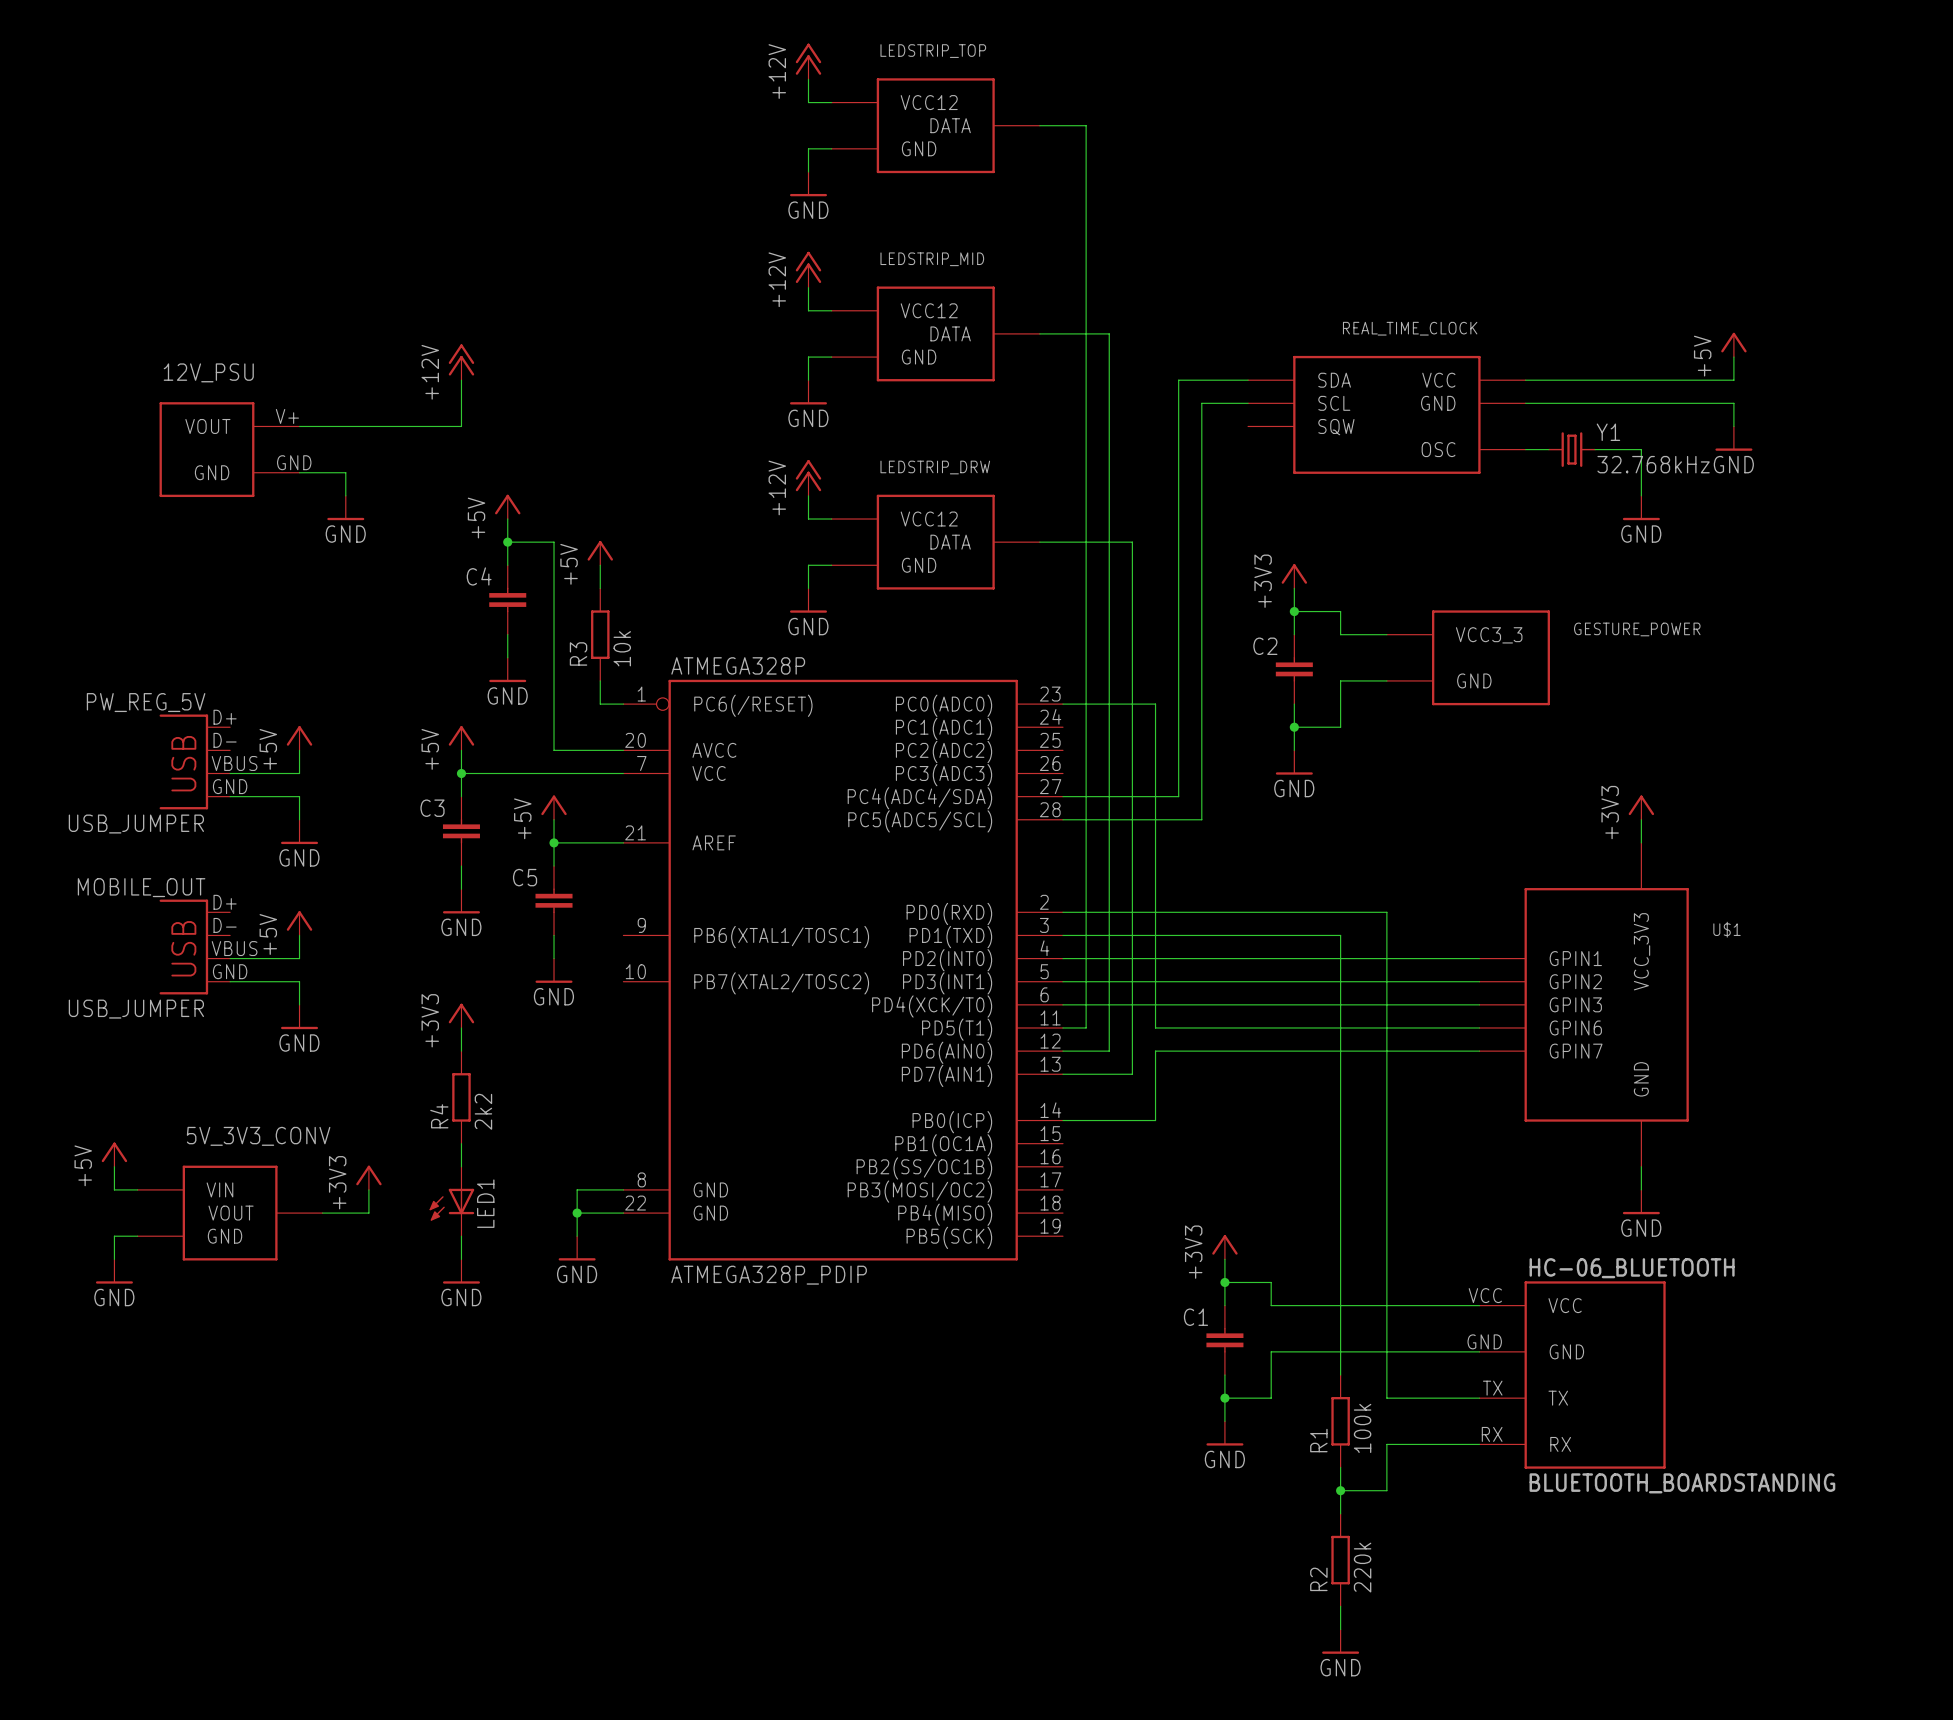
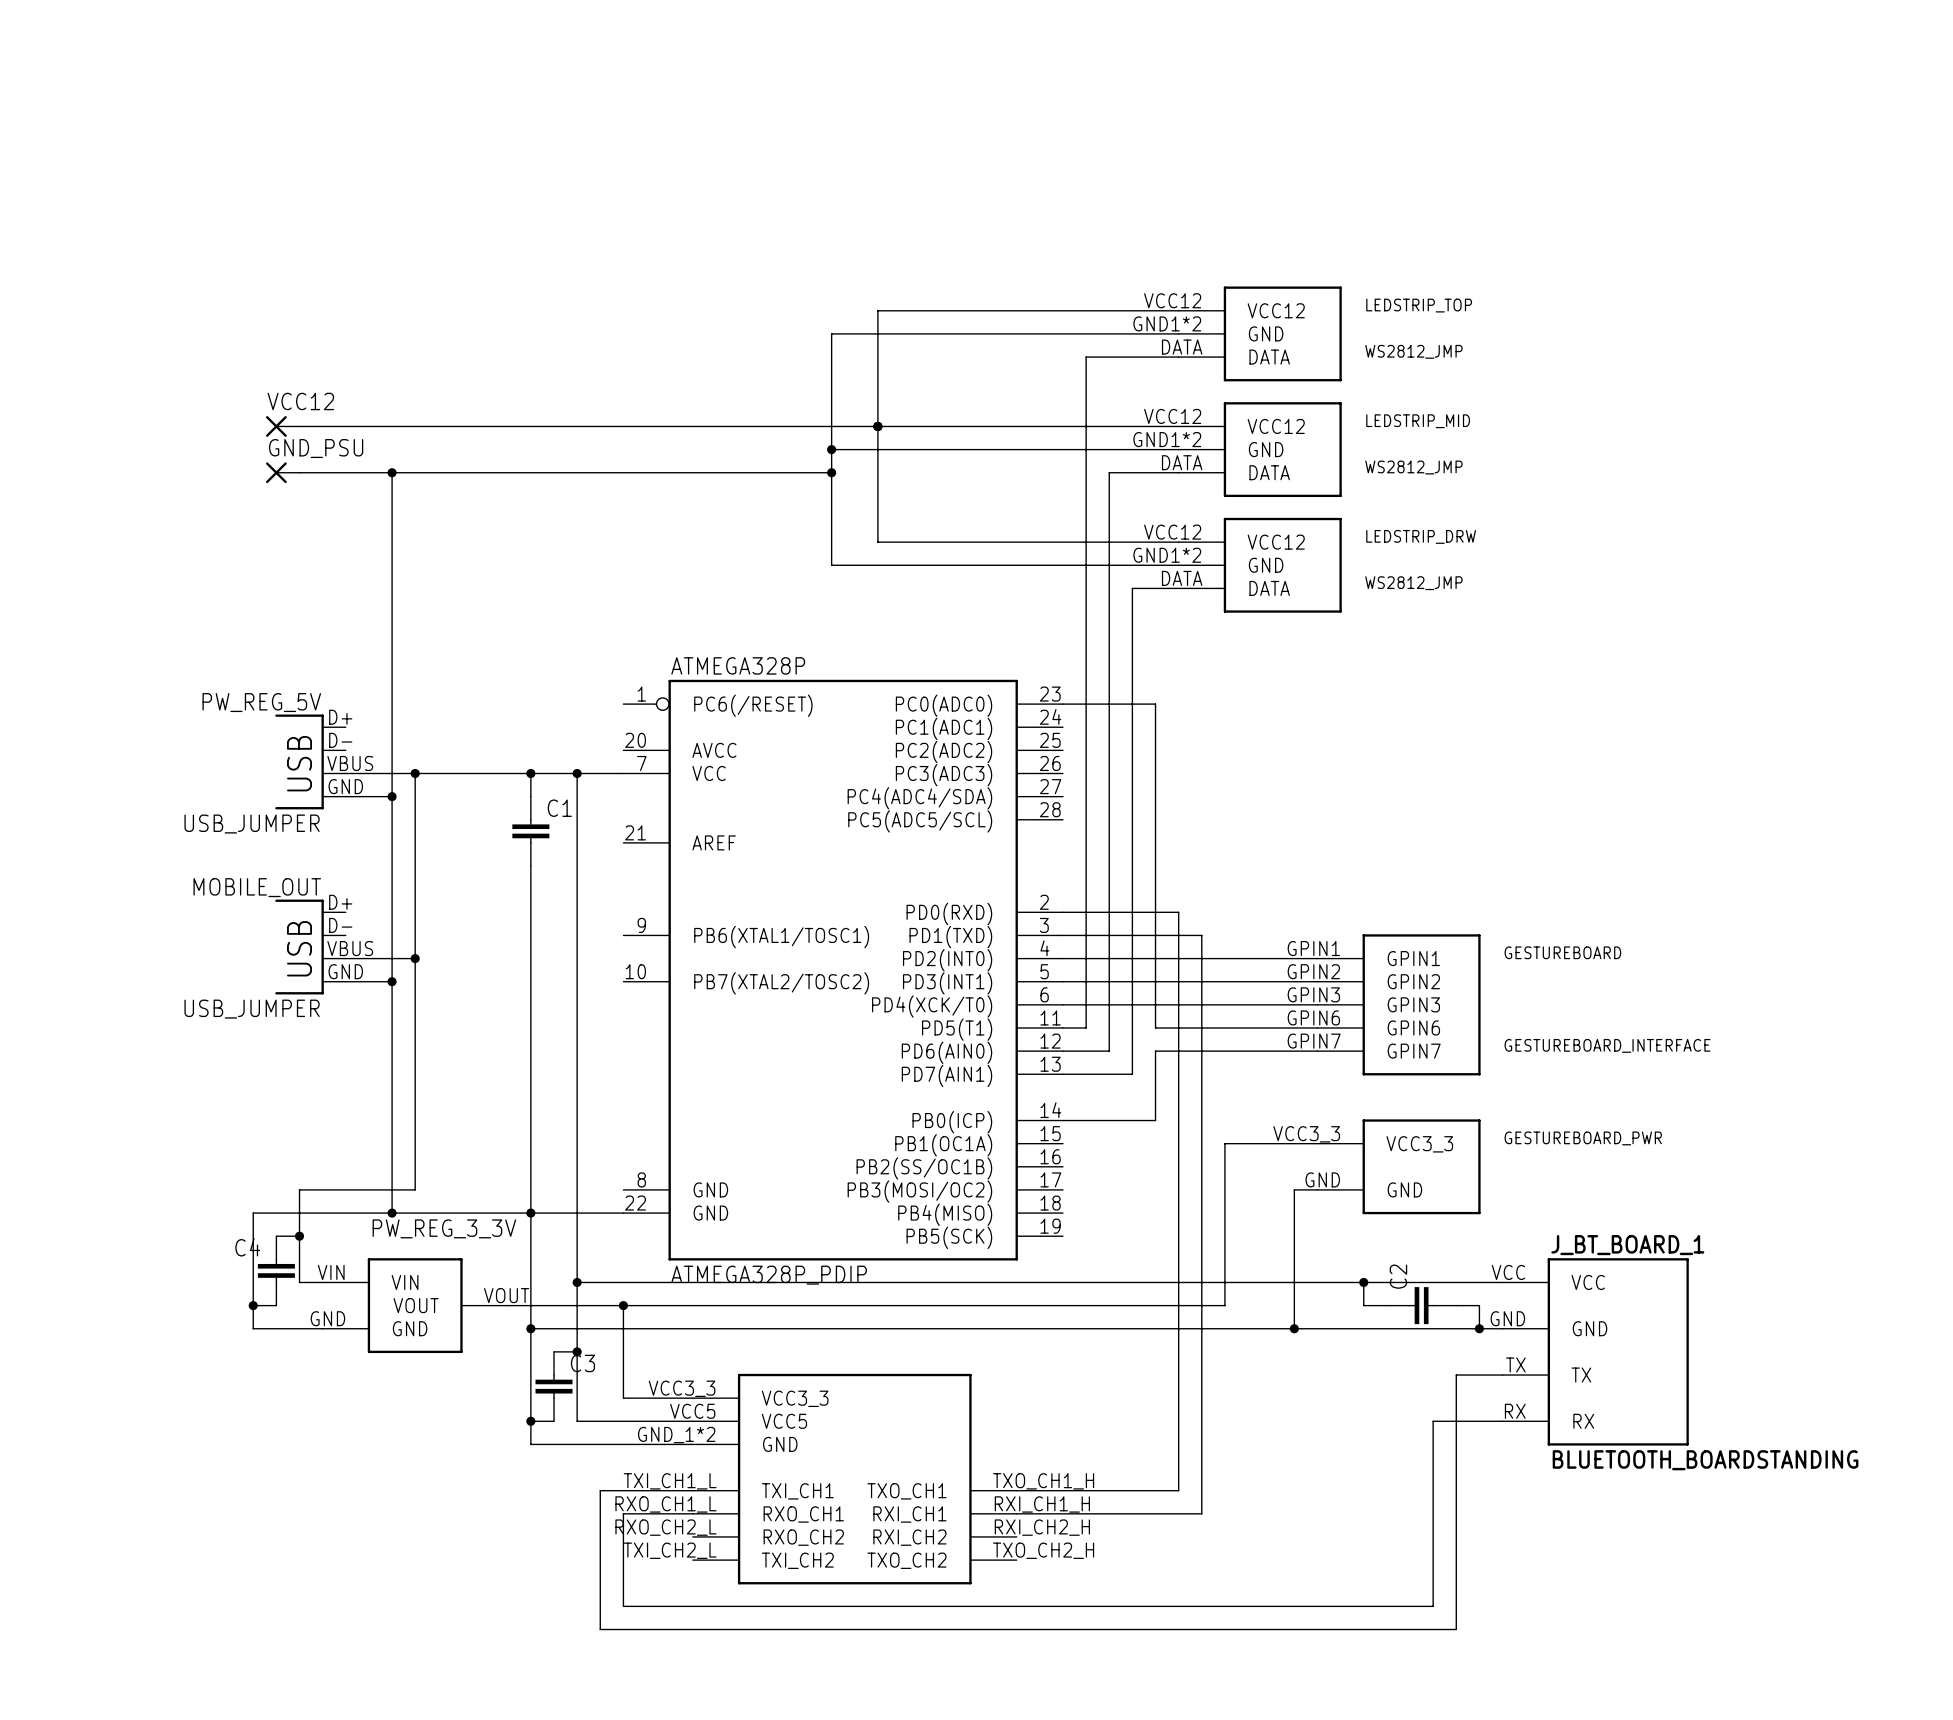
power symbol: +12V (808, 61) -> none
wire: (808, 79) (808, 102) (831, 102) -> none
LEDSTRIP_TOP: (935, 125) -> none
wire: (1039, 125) (1086, 125) (1086, 357) -> (1178, 357) (1086, 357)
wire: (831, 148) (808, 148) (808, 171) -> none
power symbol: GND (808, 184) -> none
power symbol: +12V (808, 269) -> none
wire: (808, 287) (808, 310) (831, 310) -> none
wire: none -> (1178, 310) (877, 310) (877, 542) (1039, 542)
LEDSTRIP_MID: (935, 333) -> none
wire: none -> (1039, 333) (831, 333) (831, 565) (1178, 565)
wire: (1109, 333) (1109, 472) -> (1109, 333) (1178, 333)
LEDSTRIP_TOP: none -> WS2812_JMP (1260, 333)
power symbol: +5V (1733, 344) -> none
wire: (831, 357) (808, 357) (808, 380) -> none
wire: (1733, 357) (1733, 380) (1525, 380) -> none
power symbol: +12V (461, 362) -> none
wire: (461, 380) (461, 426) -> (1178, 426) (461, 426)
wire: (1248, 380) (1178, 380) (1178, 796) (1062, 796) -> none
power symbol: GND (808, 392) -> none
wire: (1248, 403) (1201, 403) (1201, 819) (1062, 819) -> none
wire: (1525, 403) (1733, 403) (1733, 426) -> none
REAL_TIME_CLOCK: (1386, 414) -> none
VCC12: none -> (282, 426)
junction: none -> (877, 426)
power symbol: GND (1733, 438) -> none
12V_PSU: (229, 449) -> none
wire: none -> (831, 449) (1178, 449)
junction: none -> (831, 449)
LEDSTRIP_MID: none -> WS2812_JMP (1260, 449)
wire: (1525, 449) (1548, 449) -> none
Y1: 32.768kHz (1571, 449) -> none
wire: (1595, 449) (1641, 449) (1641, 495) -> none
GND_PSU: none -> (282, 472)
wire: (345, 472) (345, 495) -> (345, 472) (831, 472)
wire: none -> (392, 472) (392, 1213)
junction: none -> (392, 472)
junction: none -> (831, 472)
wire: none -> (1109, 472) (1178, 472)
power symbol: +12V (808, 477) -> none
wire: (808, 495) (808, 519) (831, 519) -> none
power symbol: +5V (507, 506) -> none
power symbol: GND (345, 508) -> none
power symbol: GND (1641, 508) -> none
wire: (507, 519) (507, 565) -> none
wire: (507, 542) (554, 542) (554, 750) (623, 750) -> none
junction: (507, 542) -> none
LEDSTRIP_DRW: (935, 542) -> none
wire: (1132, 542) (1132, 588) -> (1132, 542) (1178, 542)
power symbol: +5V (600, 553) -> none
wire: (600, 565) (600, 588) -> none
wire: (831, 565) (808, 565) (808, 588) -> none
LEDSTRIP_DRW: none -> WS2812_JMP (1260, 565)
power symbol: +3V3 (1294, 576) -> none
wire: none -> (1132, 588) (1178, 588)
wire: (1294, 588) (1294, 634) -> none
C4 position: (507, 599) -> (276, 1270)
power symbol: GND (808, 600) -> none
wire: (1294, 611) (1340, 611) (1340, 634) (1386, 634) -> none
junction: (1294, 611) -> none
wire: (507, 634) (507, 657) -> none
R3: 10k (600, 634) -> none
GESTURE_POWER: (1468, 657) -> none
power symbol: GND (507, 669) -> none
C2 rotation: 0° (1294, 669) -> 90° clockwise (1421, 1305)
C2 position: (1294, 669) -> (1421, 1305)
wire: (600, 680) (600, 704) (623, 704) -> none
wire: (1386, 680) (1340, 680) (1340, 727) (1294, 727) -> none
wire: (1294, 704) (1294, 750) -> none
junction: (1294, 727) -> none
power symbol: +5V (299, 738) -> none
power symbol: +5V (461, 738) -> none
wire: (299, 750) (299, 773) (230, 773) -> none
wire: (461, 750) (461, 796) -> none
PW_REG_5V position: (194, 761) -> (310, 761)
power symbol: GND (1294, 762) -> none
wire: none -> (345, 773) (461, 773)
wire: none -> (415, 773) (415, 1189) (299, 1189) (299, 1282) (322, 1282)
junction: none -> (415, 773)
junction: (461, 773) -> none
junction: none -> (530, 773)
junction: none -> (577, 773)
wire: (230, 796) (299, 796) (299, 819) -> none
wire: none -> (345, 796) (392, 796)
junction: none -> (392, 796)
power symbol: +5V (554, 807) -> none
power symbol: +3V3 (1641, 807) -> none
C3 name position: C3 (432, 808) -> C3 (582, 1363)
wire: (554, 819) (554, 866) -> none
wire: (1641, 819) (1641, 842) -> none
power symbol: GND (299, 831) -> none
C3 position: (461, 831) -> (554, 1386)
wire: (554, 842) (623, 842) -> none
junction: (554, 842) -> none
wire: (461, 866) (461, 889) -> (530, 773) (530, 796)
wire: none -> (530, 866) (530, 1444) (692, 1444)
C5: (554, 900) -> none
power symbol: GND (461, 901) -> none
wire: (1178, 912) (1386, 912) (1386, 1398) (1479, 1398) -> (1178, 912) (1178, 1490) (1016, 1490)
power symbol: +5V (299, 923) -> none
wire: (299, 935) (299, 958) (230, 958) -> none
wire: (554, 935) (554, 958) -> none
wire: (1201, 935) (1340, 935) (1340, 1375) -> (1201, 935) (1201, 1513) (1016, 1513)
MOBILE_OUT position: (194, 947) -> (310, 947)
wire: none -> (345, 958) (415, 958)
junction: none -> (415, 958)
wire: (1317, 958) (1479, 958) -> none
power symbol: GND (554, 970) -> none
wire: (230, 981) (299, 981) (299, 1004) -> none
wire: none -> (345, 981) (392, 981)
junction: none -> (392, 981)
wire: (1317, 981) (1479, 981) -> none
wire: (1317, 1004) (1479, 1004) -> none
GESTUREBOARD: none -> GESTUREBOARD_INTERFACE (1399, 1004)
U$1: (1584, 1004) -> none
power symbol: +3V3 (461, 1015) -> none
power symbol: GND (299, 1017) -> none
wire: (461, 1027) (461, 1051) -> none
wire: (1317, 1027) (1479, 1027) -> none
wire: (1317, 1051) (1479, 1051) -> none
R4: 2k2 (461, 1097) -> none
wire: (461, 1143) (461, 1166) -> none
wire: none -> (1317, 1143) (1224, 1143) (1224, 1259)
power symbol: +5V (114, 1154) -> none
wire: (114, 1166) (114, 1189) (137, 1189) -> none
GESTUREBOARD_PWR: none -> (1399, 1166)
wire: (1641, 1166) (1641, 1189) -> (1479, 1305) (1479, 1328)
power symbol: +3V3 (368, 1177) -> none
wire: (368, 1189) (368, 1213) -> (577, 1213) (368, 1213)
wire: (577, 1189) (623, 1189) -> (577, 1189) (577, 773)
wire: none -> (1317, 1189) (1294, 1189) (1294, 1328)
LED1: (451, 1201) -> none
power symbol: GND (1641, 1202) -> none
5V_3V3_CONV: (230, 1213) -> none
wire: none -> (322, 1213) (253, 1213) (253, 1328) (322, 1328)
junction: none -> (392, 1213)
junction: none -> (530, 1213)
junction: (577, 1213) -> none
wire: (137, 1236) (114, 1236) (114, 1259) -> none
wire: none -> (276, 1236) (299, 1236)
junction: none -> (299, 1236)
wire: (461, 1236) (461, 1259) -> none
wire: none -> (577, 1236) (577, 1421) (692, 1421)
power symbol: +3V3 (1224, 1247) -> none
power symbol: GND (577, 1248) -> none
power symbol: GND (114, 1271) -> none
power symbol: GND (461, 1271) -> none
wire: none -> (577, 1282) (1224, 1282)
junction: none -> (577, 1282)
junction: (1224, 1282) -> none
wire: (1271, 1282) (1271, 1305) (1363, 1305) -> (1363, 1282) (1363, 1305)
wire: none -> (1271, 1282) (1502, 1282)
junction: none -> (1363, 1282)
wire: none -> (253, 1305) (276, 1305)
junction: none -> (253, 1305)
PW_REG_3_3V: none -> (415, 1305)
wire: none -> (507, 1305) (1224, 1305)
wire: none -> (623, 1305) (623, 1398) (692, 1398)
junction: none -> (623, 1305)
C1 name position: C1 (1195, 1317) -> C1 (559, 808)
wire: none -> (530, 1328) (1502, 1328)
junction: none -> (530, 1328)
junction: none -> (1294, 1328)
junction: none -> (1479, 1328)
C1 position: (1224, 1340) -> (530, 831)
wire: none -> (554, 1351) (577, 1351)
junction: none -> (577, 1351)
wire: (1479, 1351) (1271, 1351) (1271, 1398) (1224, 1398) -> none
J_BT_BOARD_1: none -> BLUETOOTH_BOARDSTANDING (1595, 1351)
wire: (1224, 1375) (1224, 1421) -> none
wire: none -> (1502, 1375) (1456, 1375) (1456, 1629) (600, 1629) (600, 1490) (692, 1490)
HC-06_BLUETOOTH: BLUETOOTH_BOARDSTANDING (1572, 1375) -> none
junction: (1224, 1398) -> none
wire: none -> (530, 1421) (554, 1421)
junction: none -> (530, 1421)
R1: 100k (1340, 1421) -> none
wire: none -> (1502, 1421) (1433, 1421) (1433, 1606) (623, 1606) (623, 1513) (692, 1513)
power symbol: GND (1224, 1433) -> none
wire: (1479, 1444) (1386, 1444) (1386, 1490) (1340, 1490) -> none
wire: (1340, 1467) (1340, 1513) -> none
part: none -> (854, 1479)
junction: (1340, 1490) -> none
R2: 220k (1340, 1560) -> none
wire: (1340, 1606) (1340, 1629) -> none
power symbol: GND (1340, 1641) -> none

